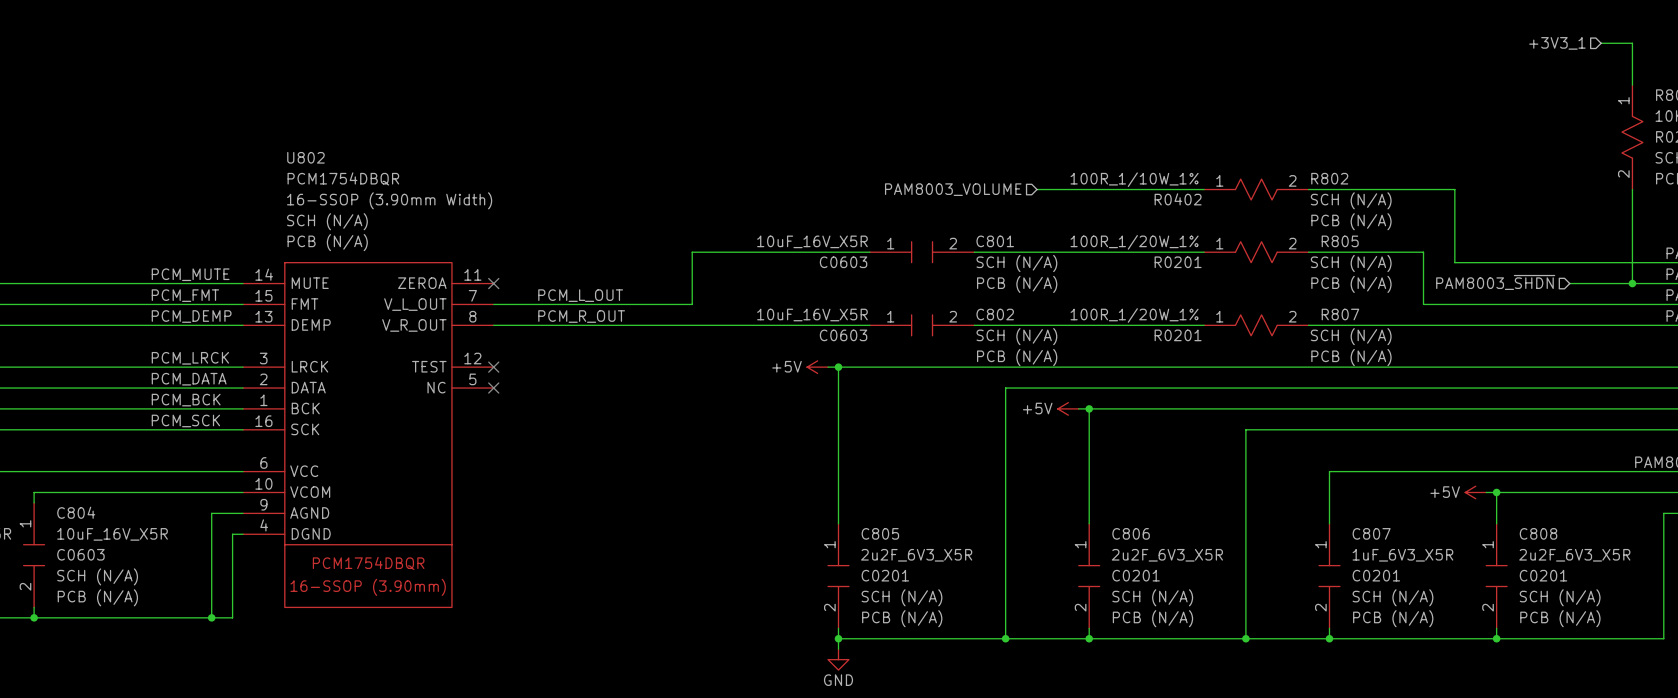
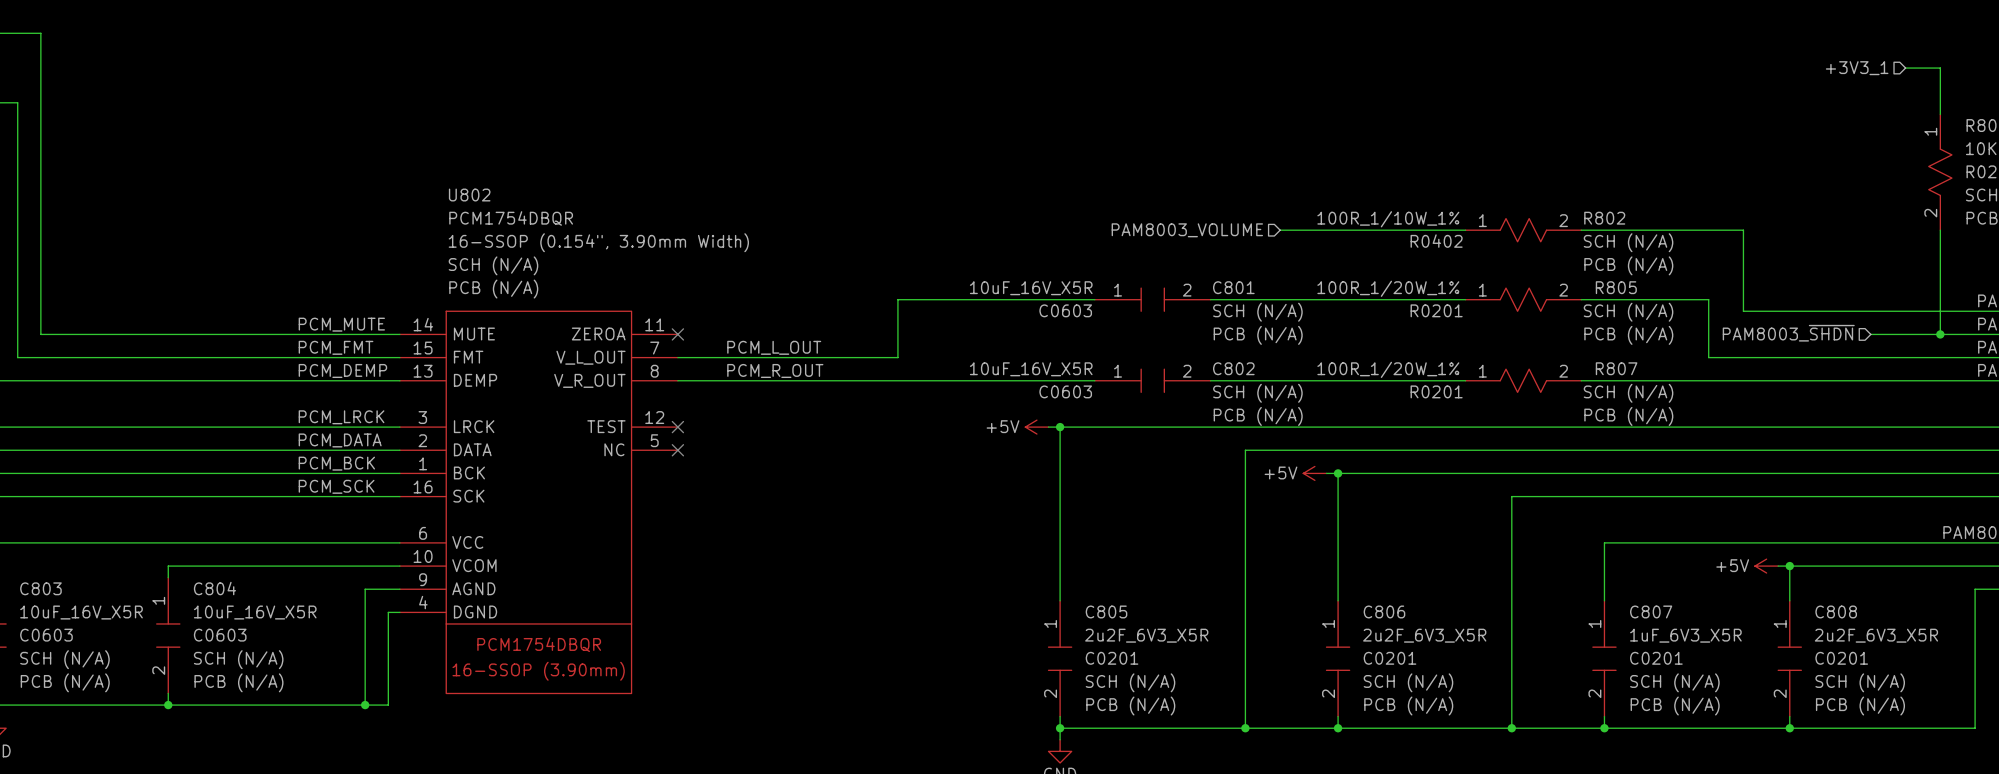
U802 text: 16-SSOP (3.90mm Width) (389, 200) -> 16-SSOP (0.154", 3.90mm Width) (598, 242)

